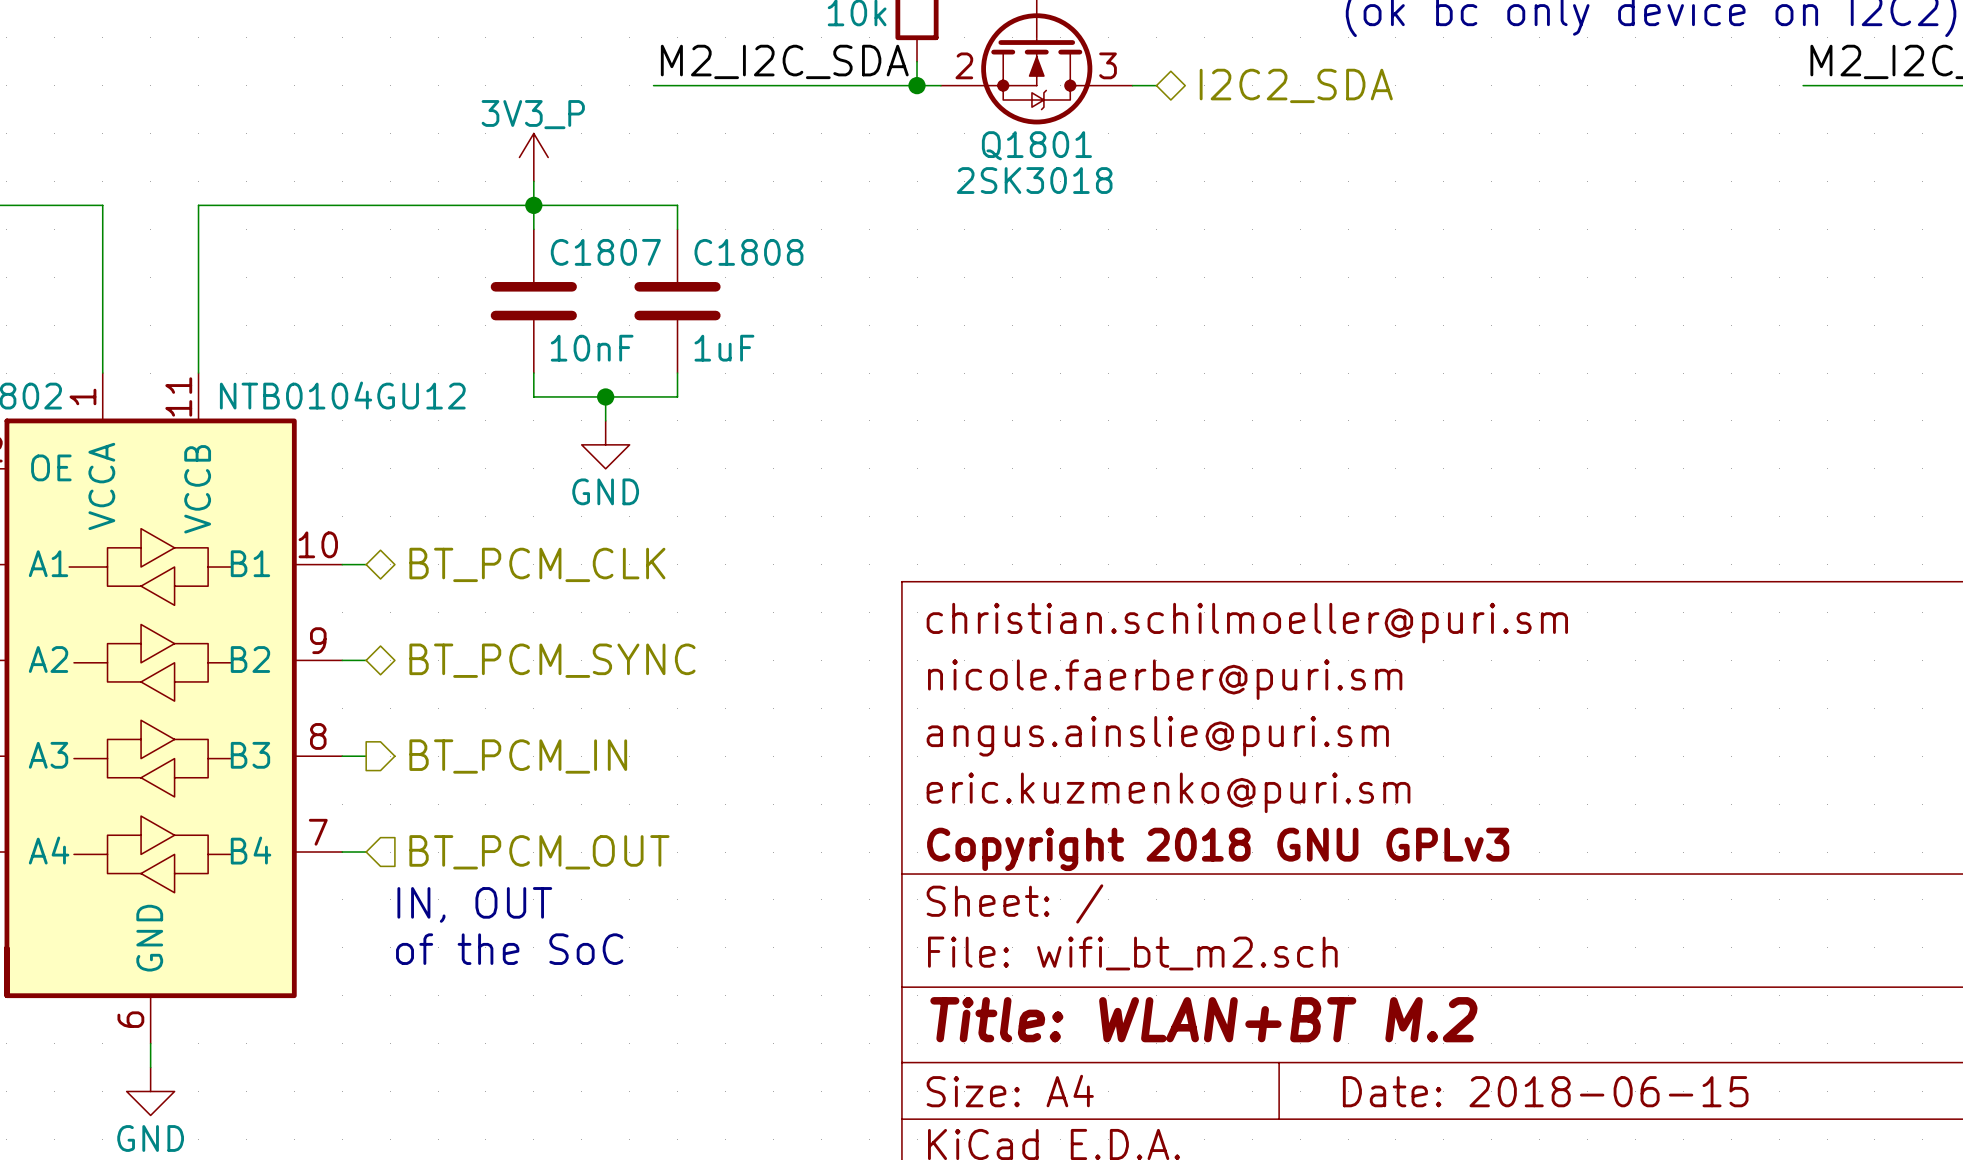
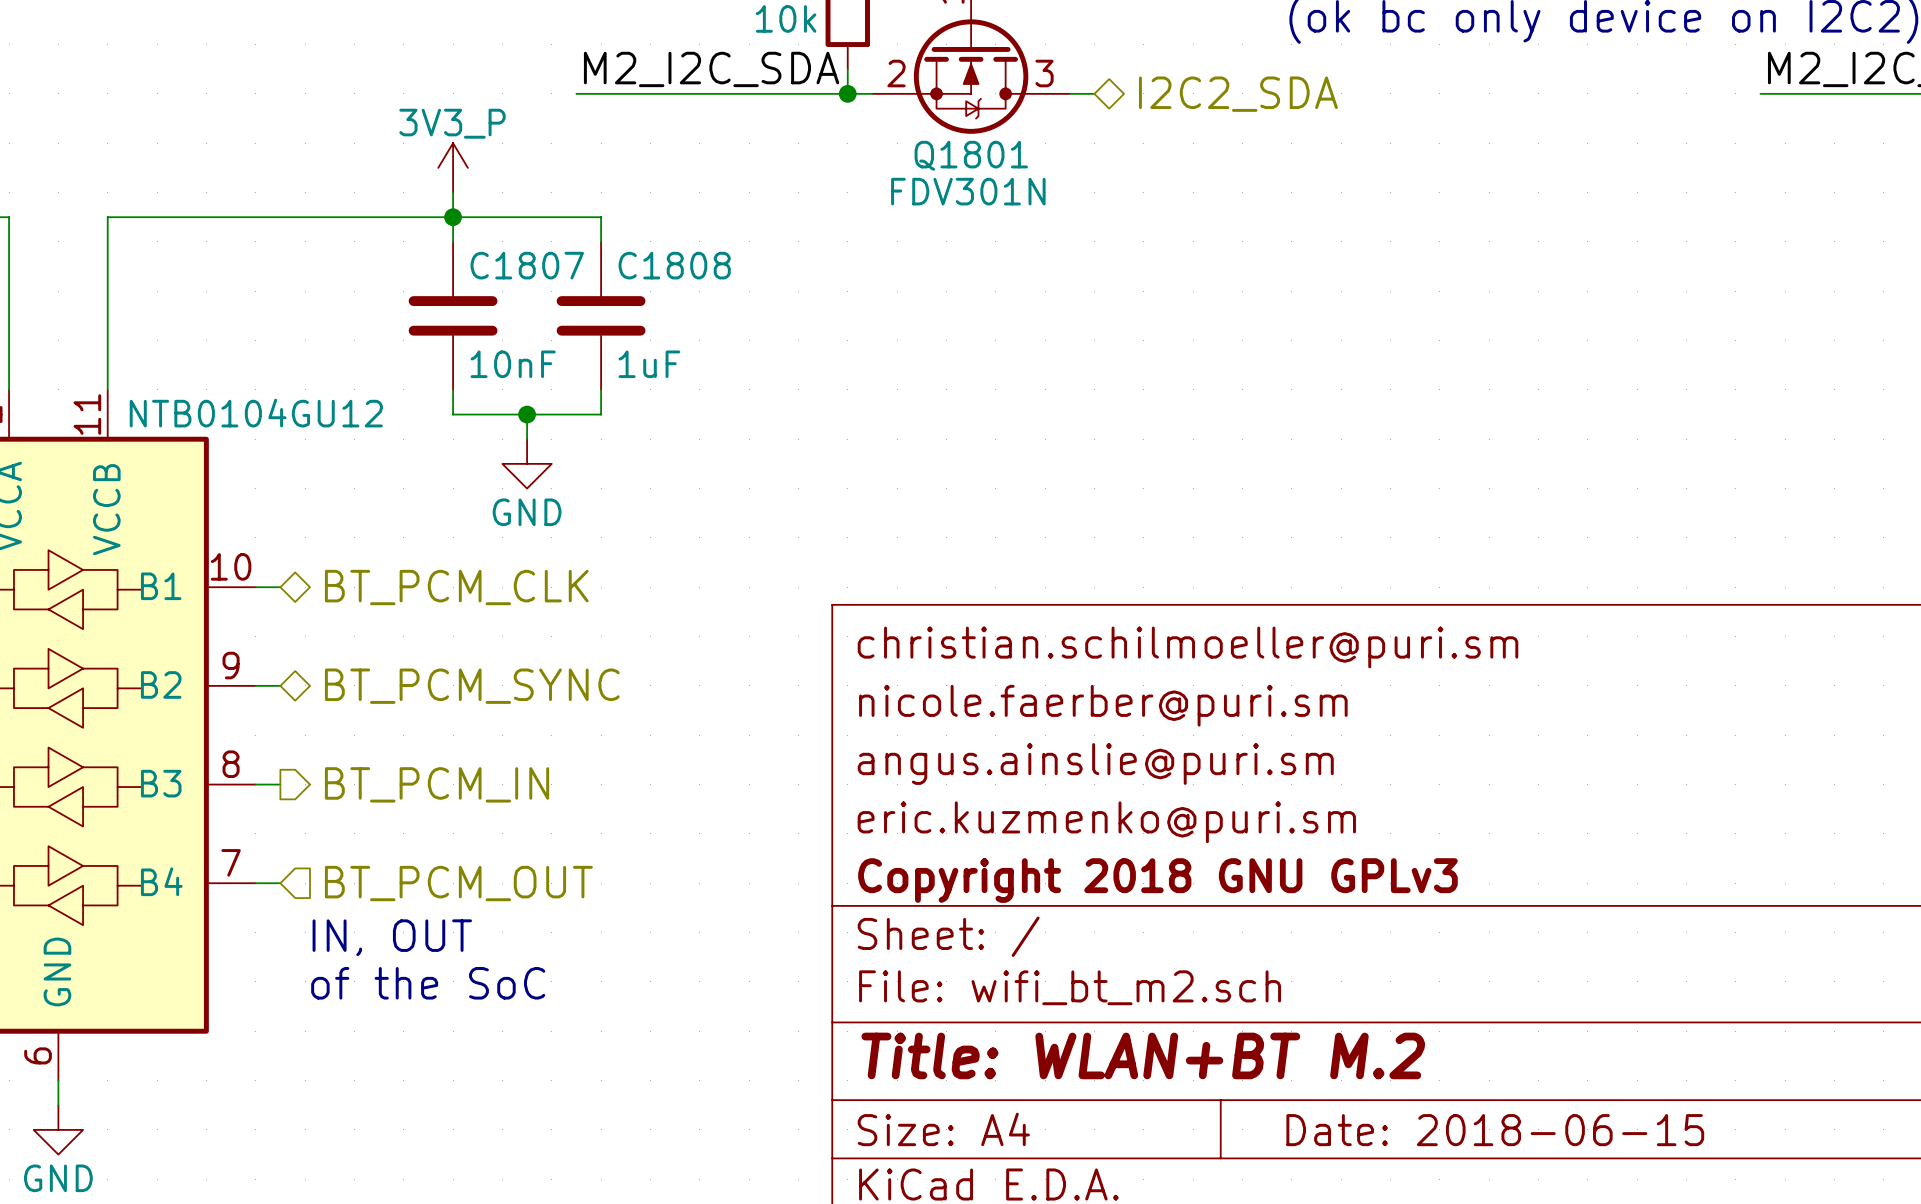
Q1801 value: 2SK3018 (1034, 180) -> FDV301N (968, 191)

